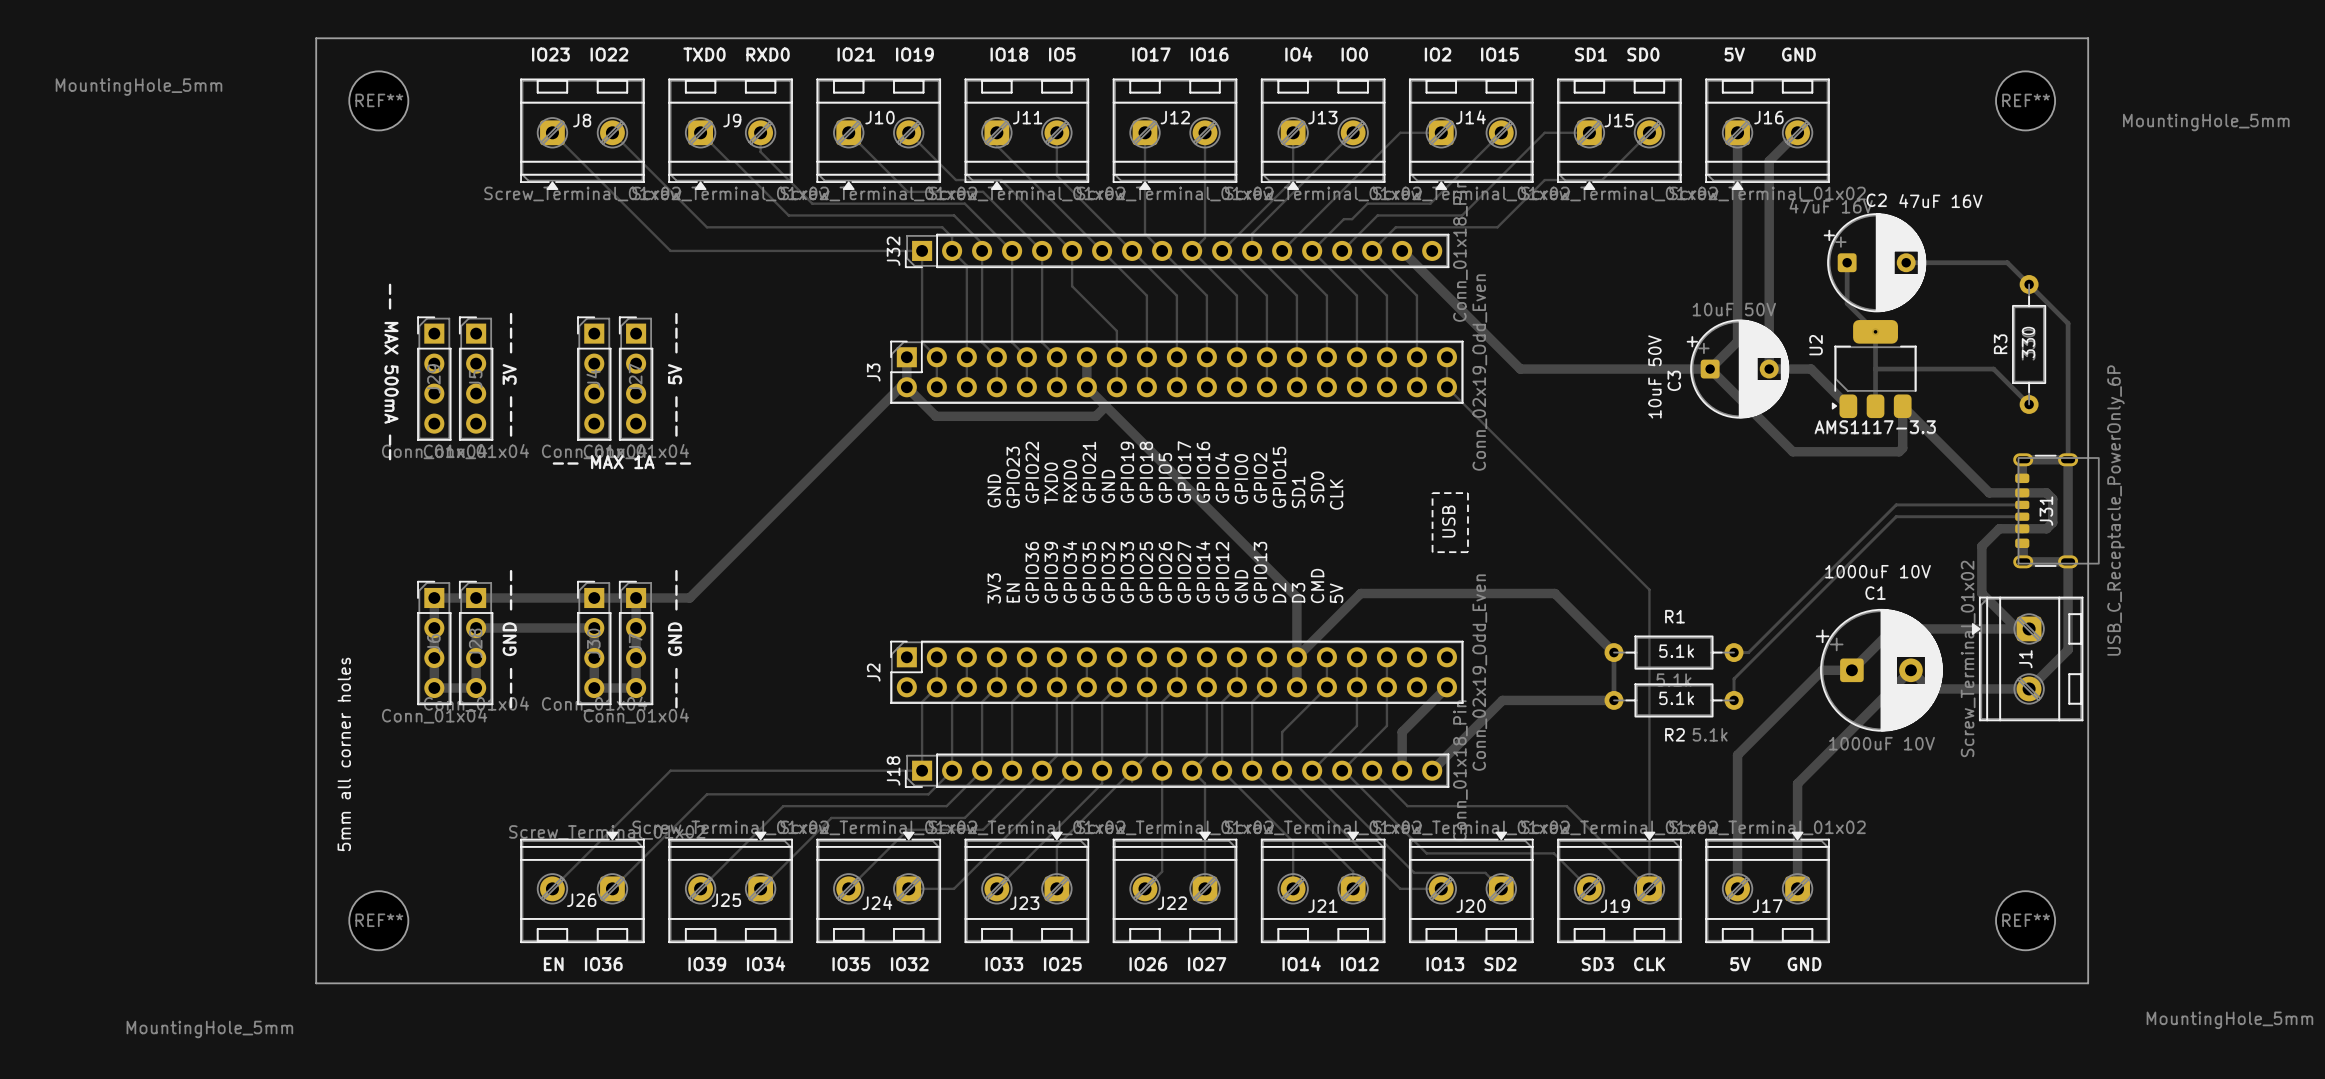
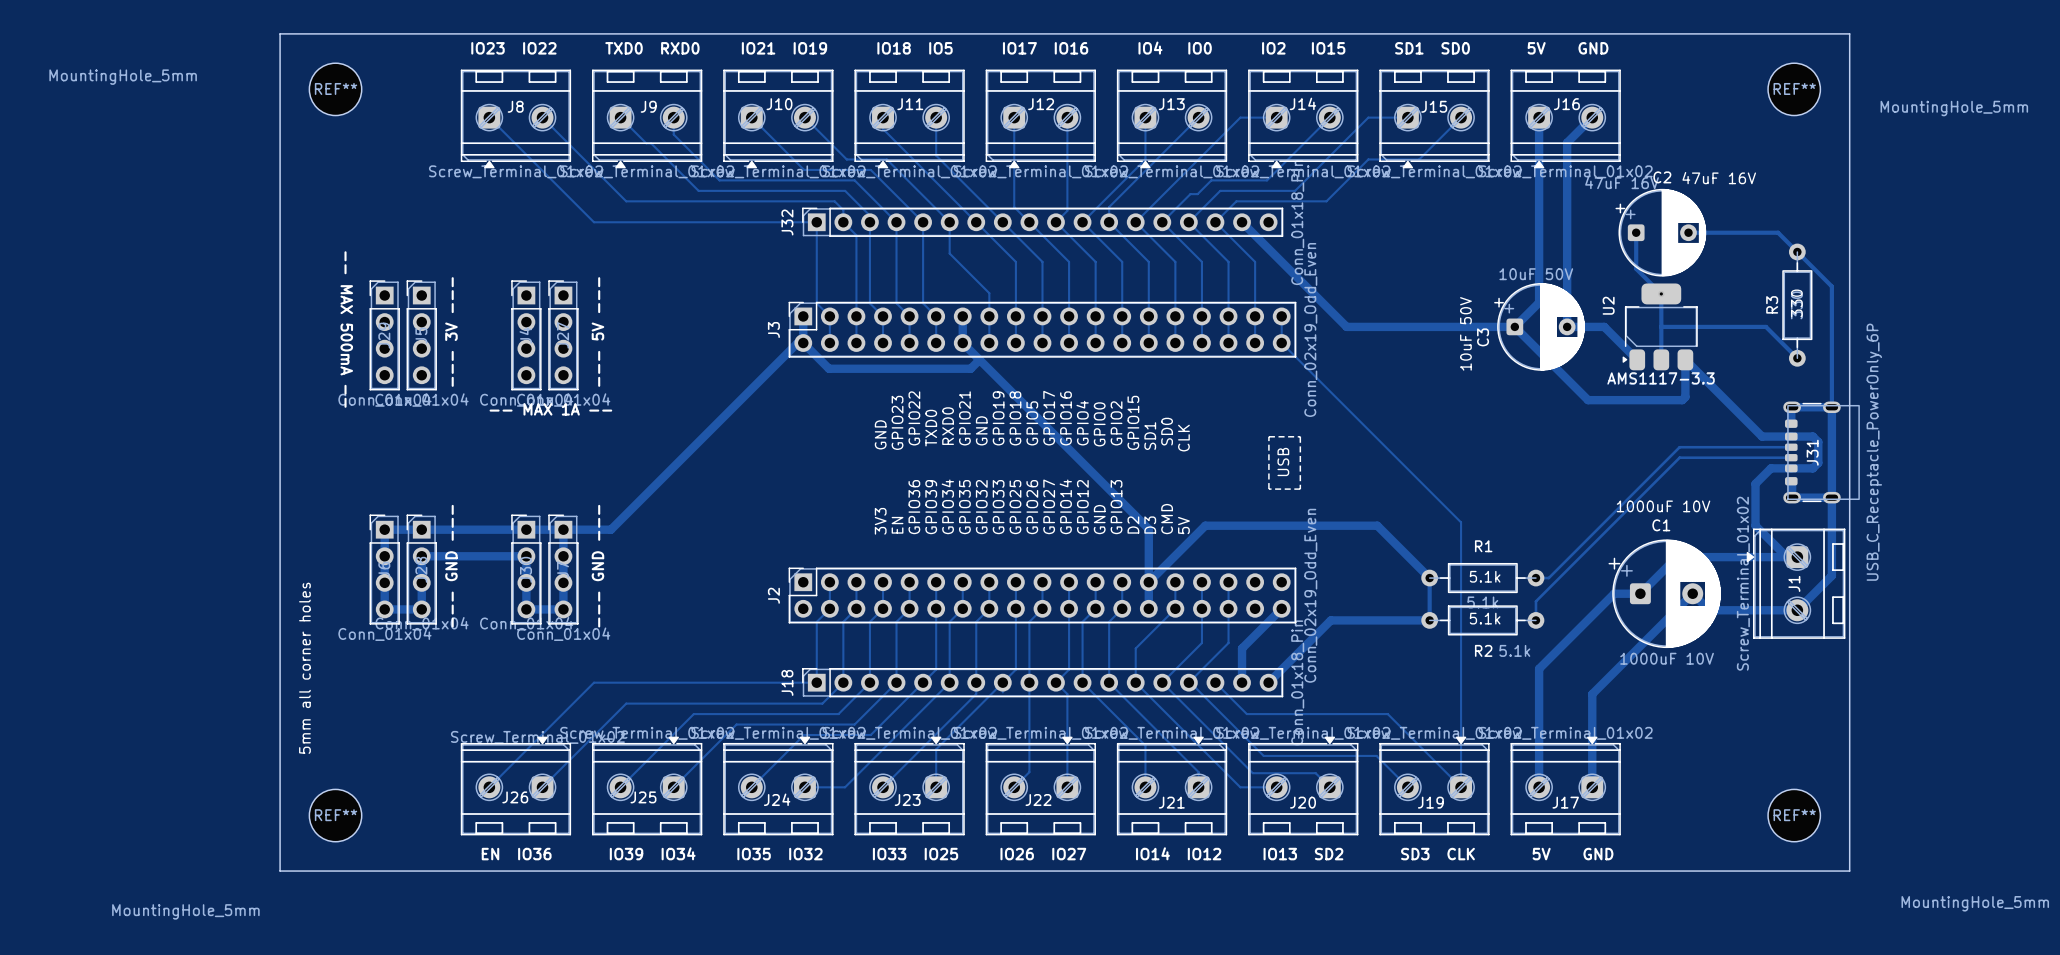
J32 footprint: [905, 233, 1450, 268] -> [802, 207, 1284, 237]
J18 footprint: [905, 753, 1450, 788] -> [802, 668, 1284, 698]

